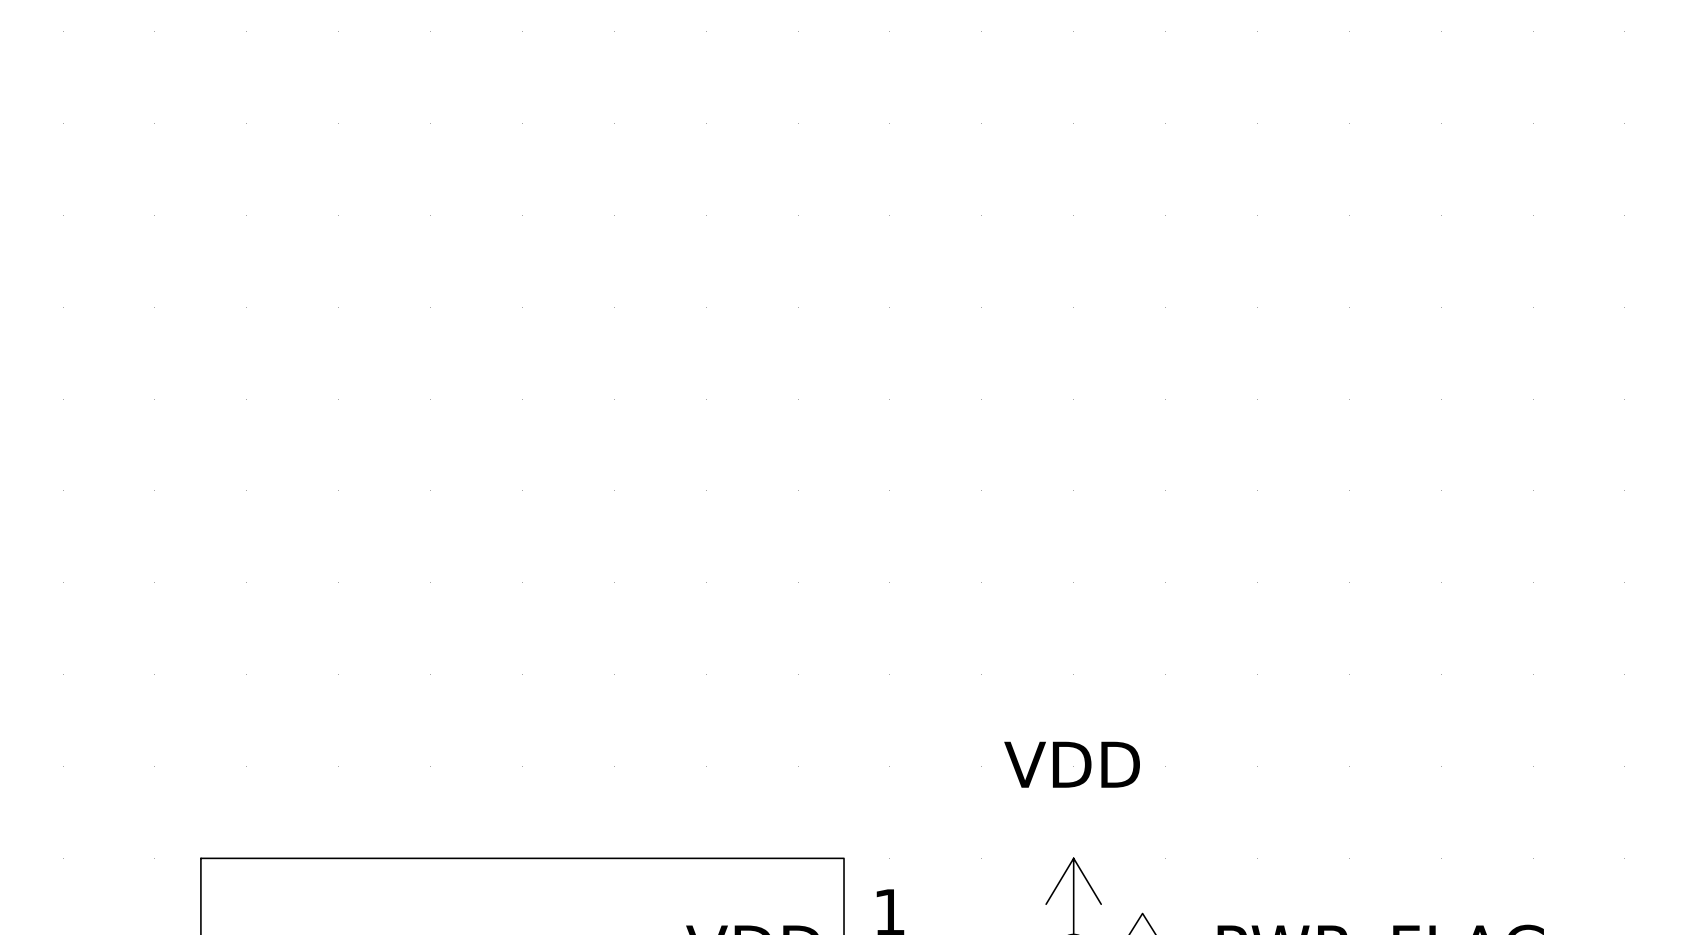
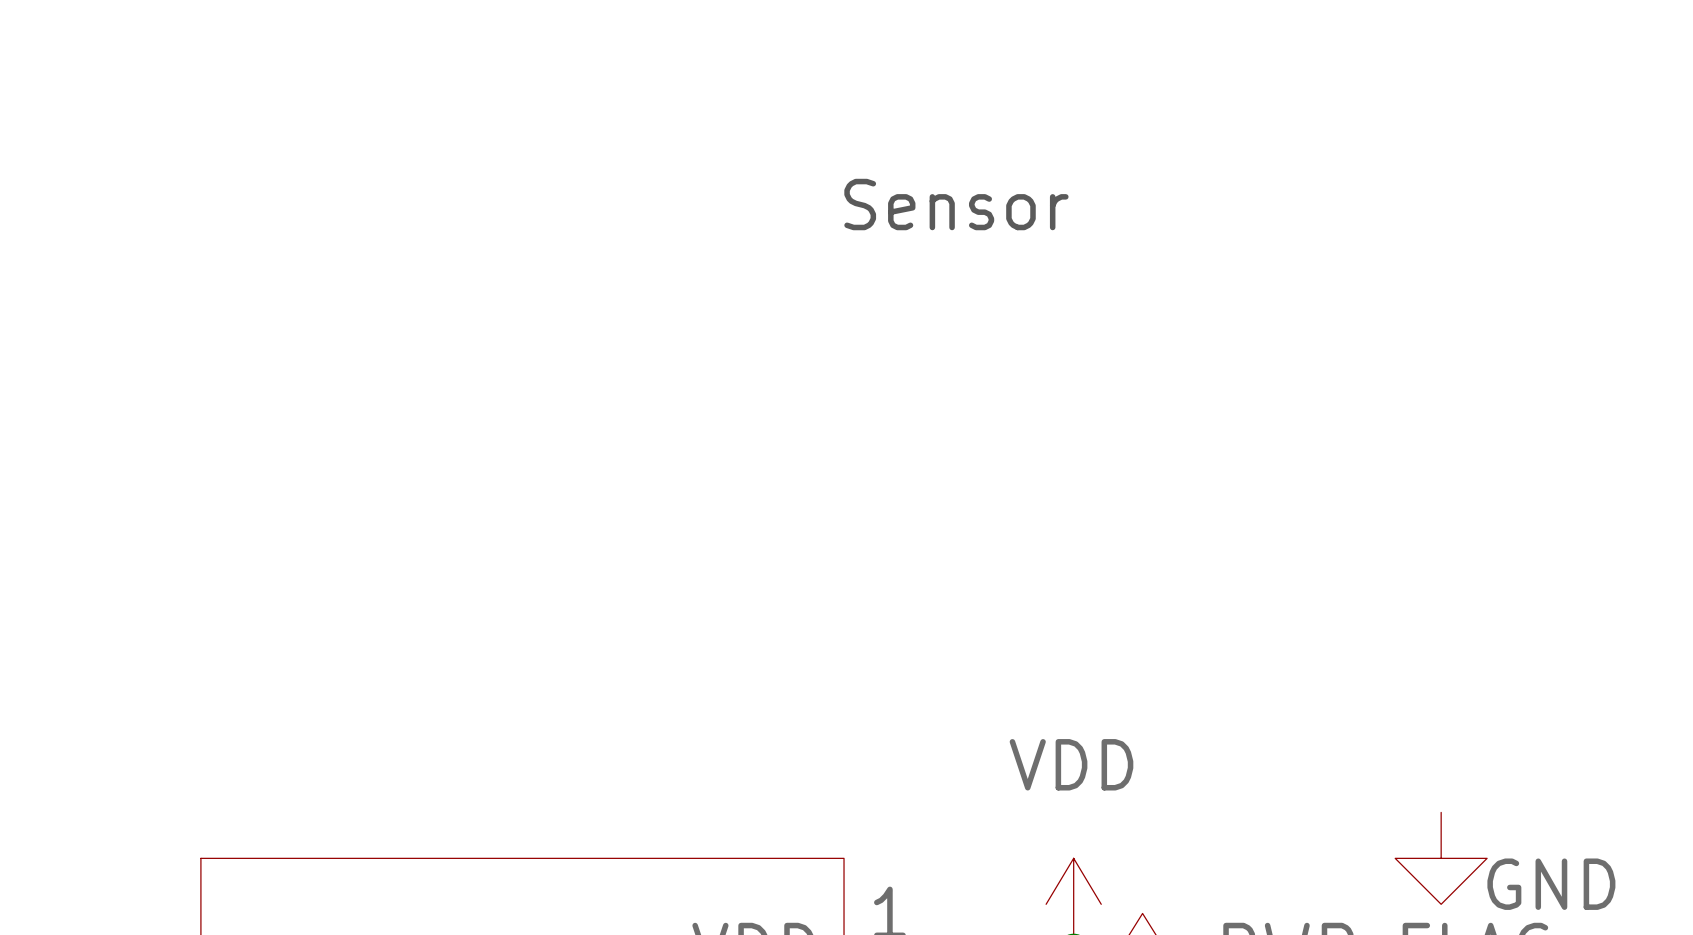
text: none -> Sensor (956, 204)
power symbol: none -> GND (1441, 858)

